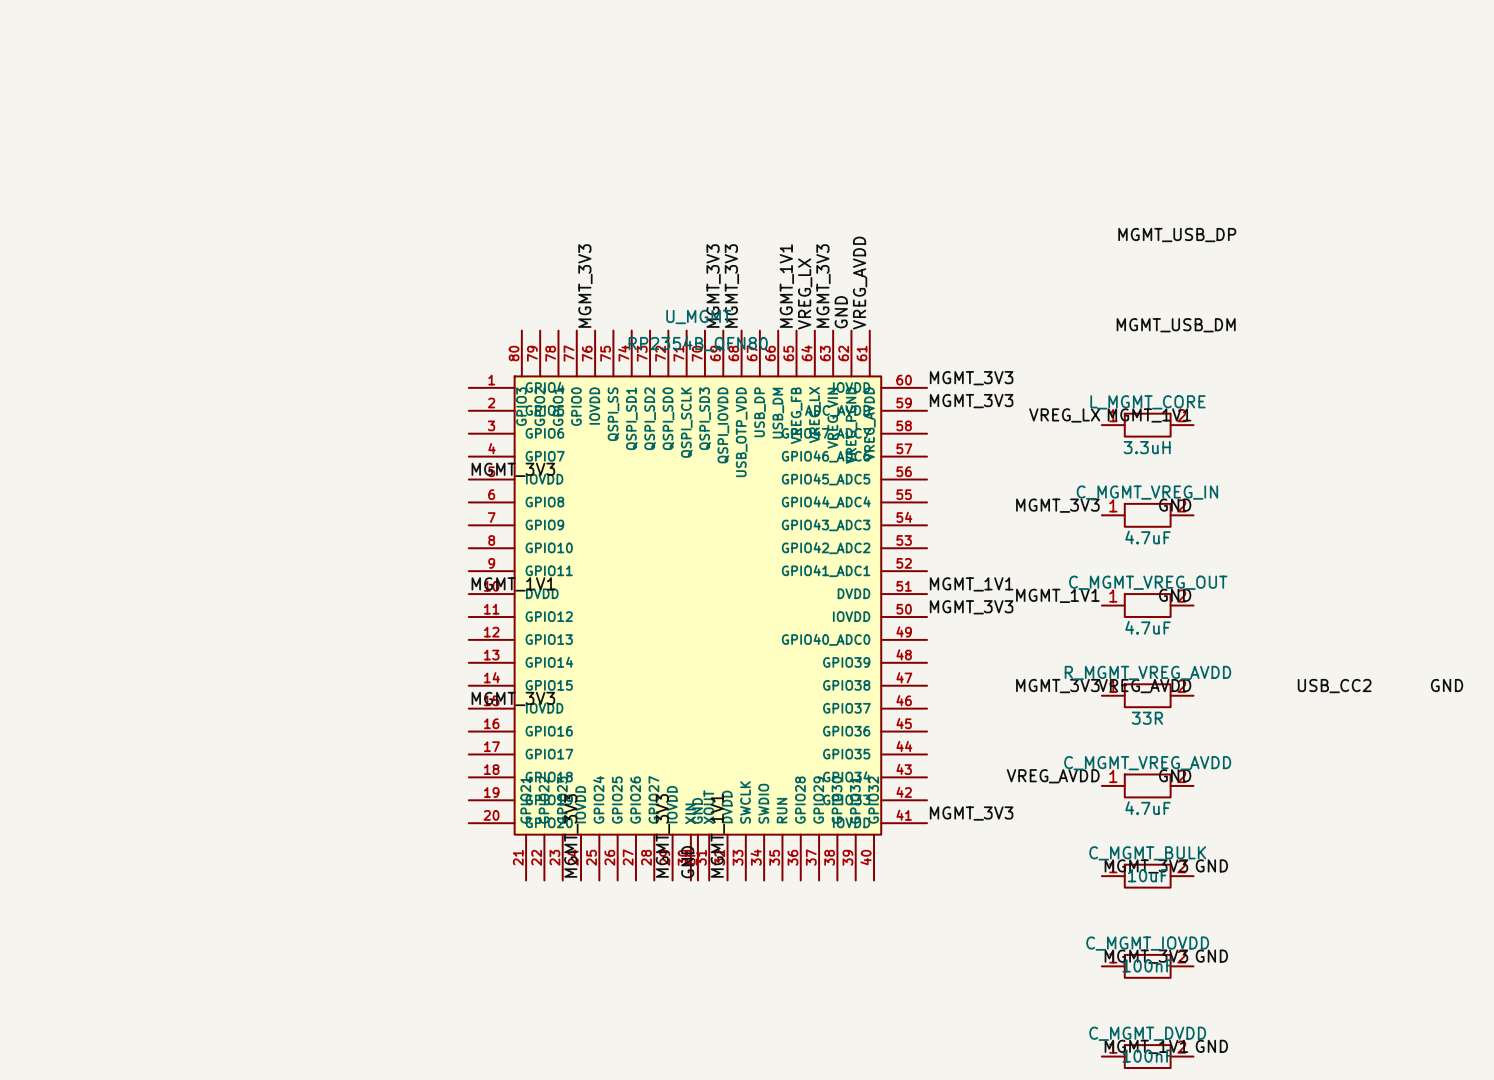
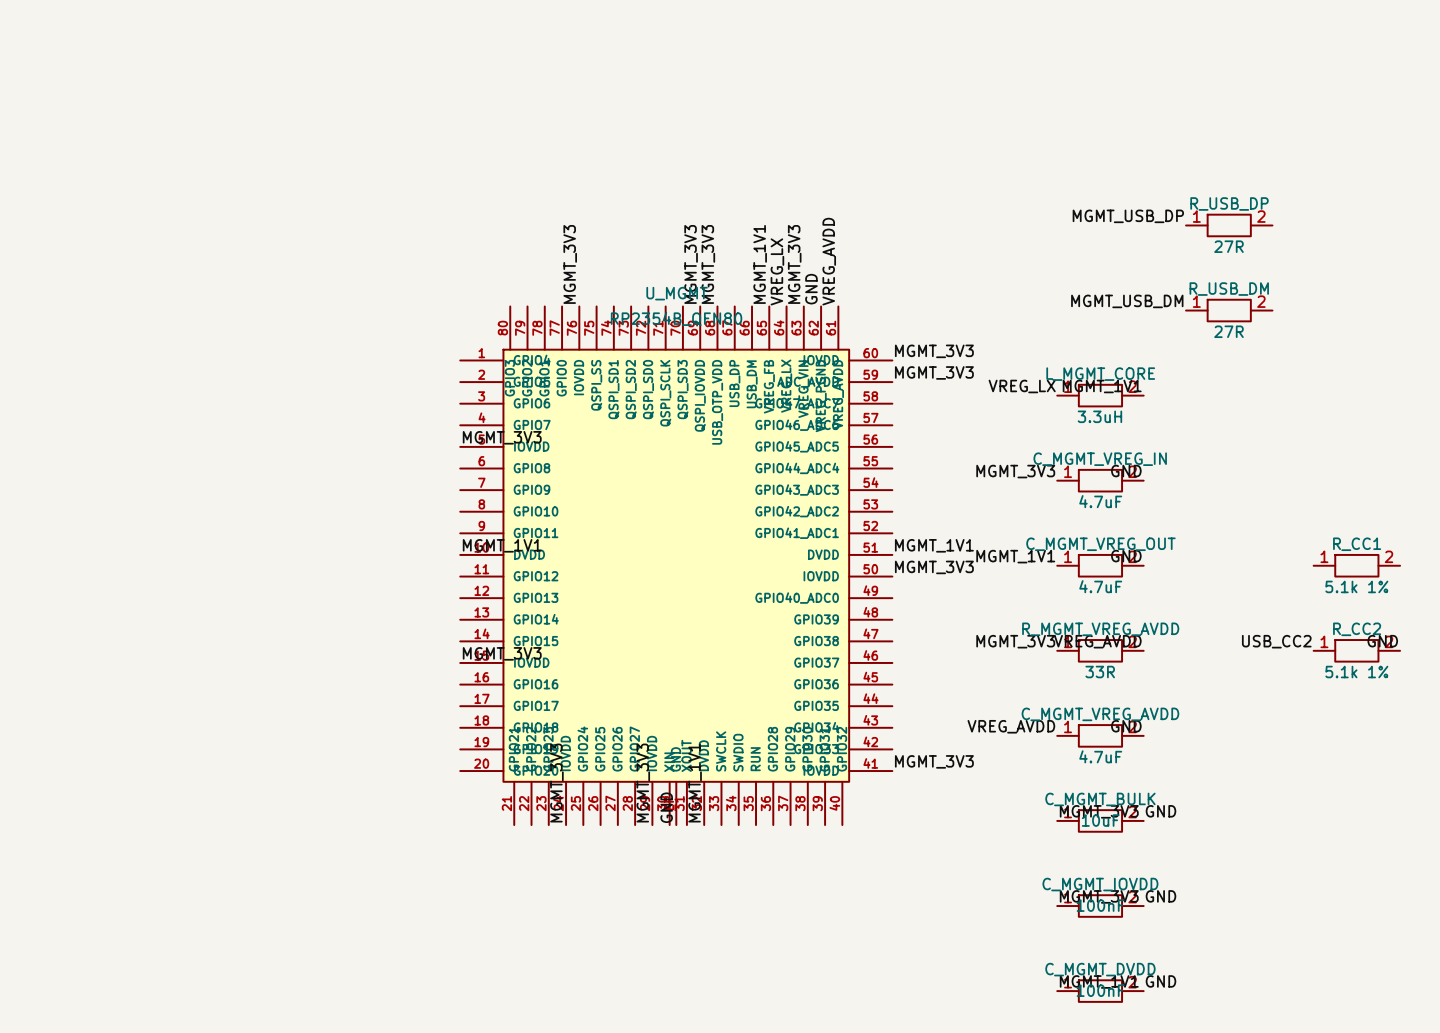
R_USB_DP: none -> 27R (1229, 225)
R_USB_DM: none -> 27R (1229, 310)
R_CC1: none -> 5.1k 1% (1356, 565)
R_CC2: none -> 5.1k 1% (1356, 650)

